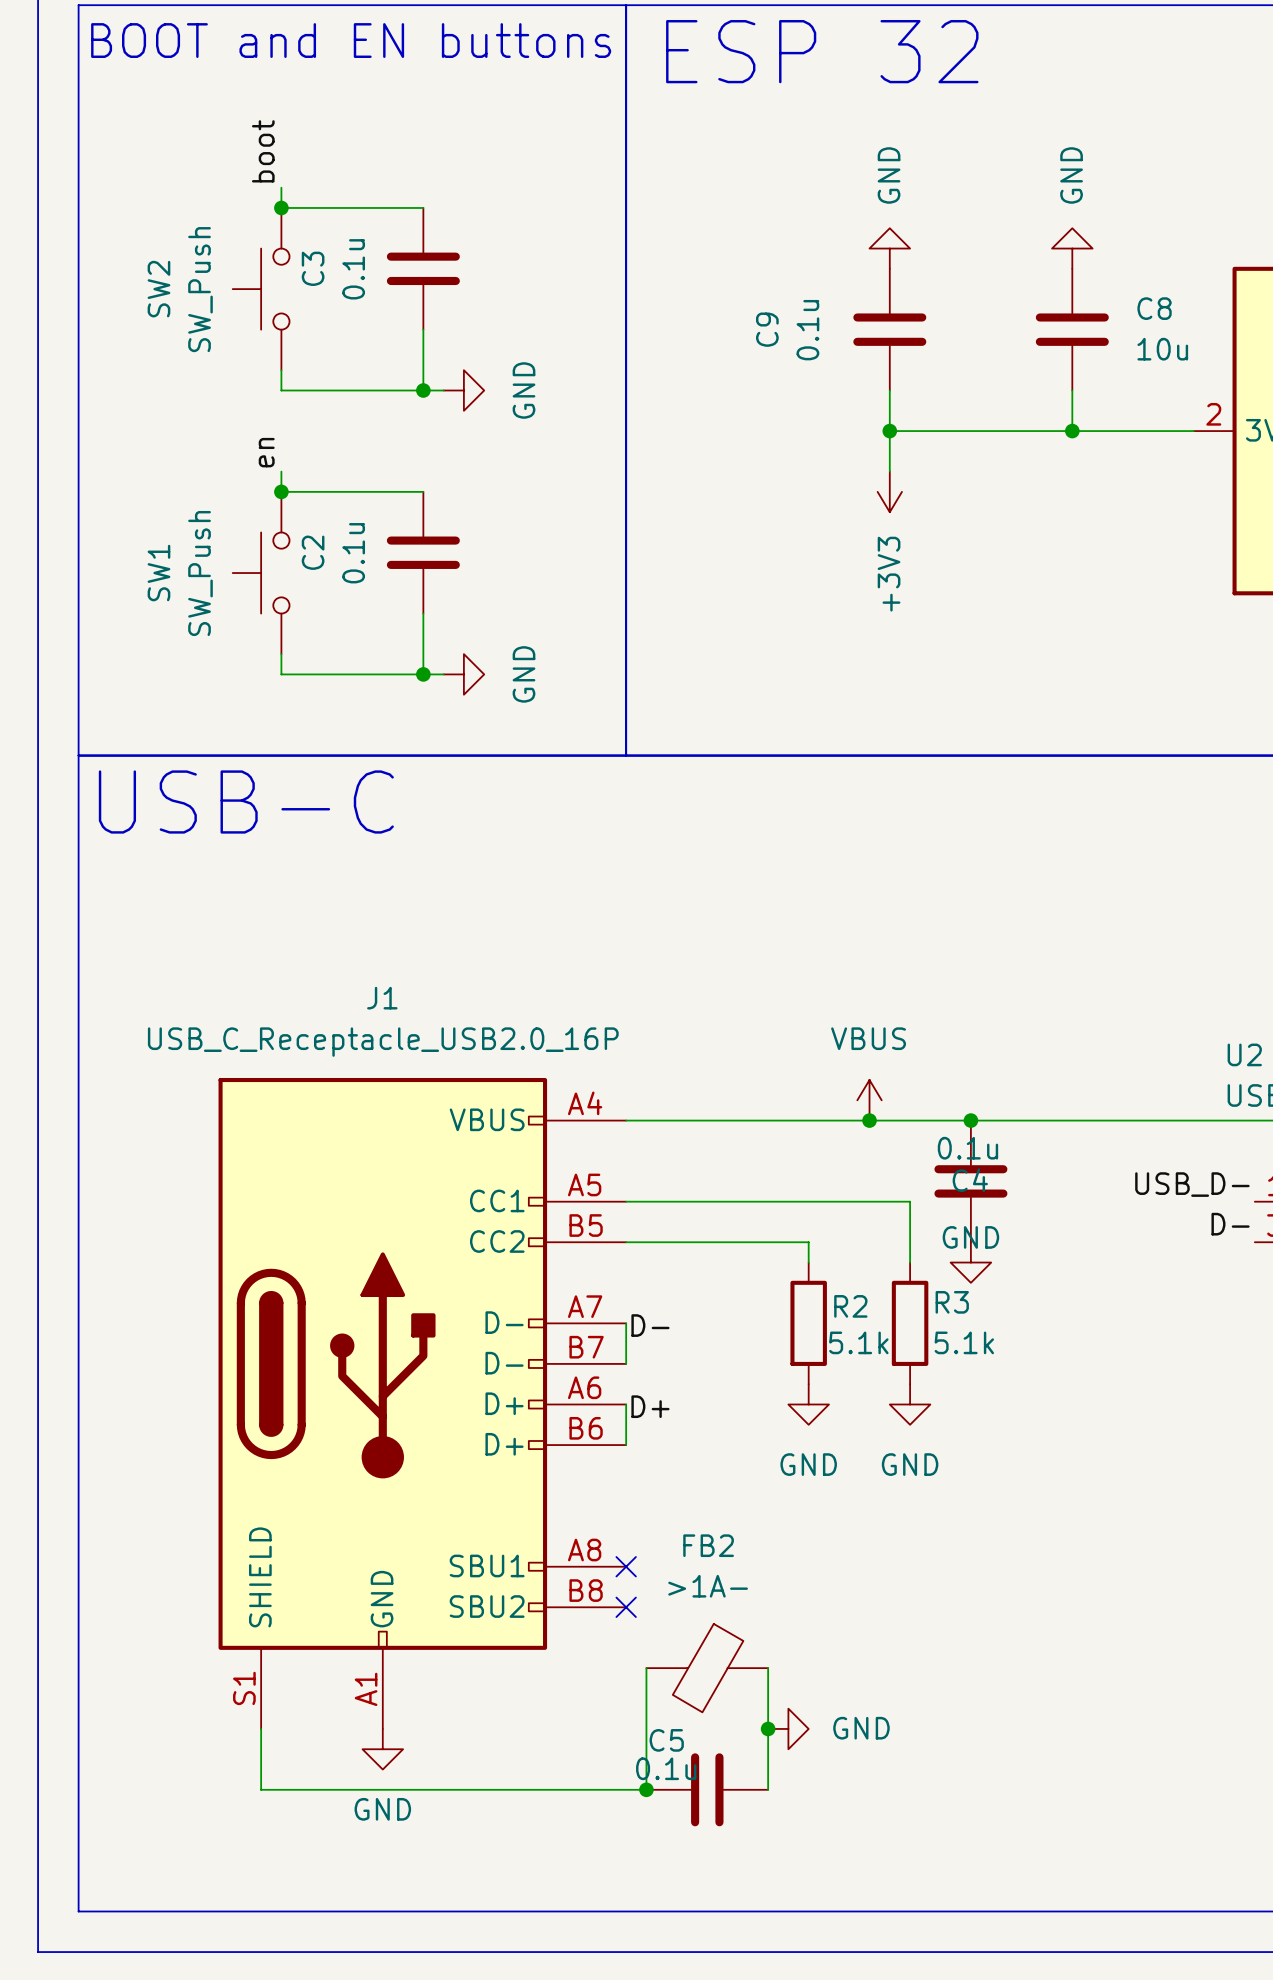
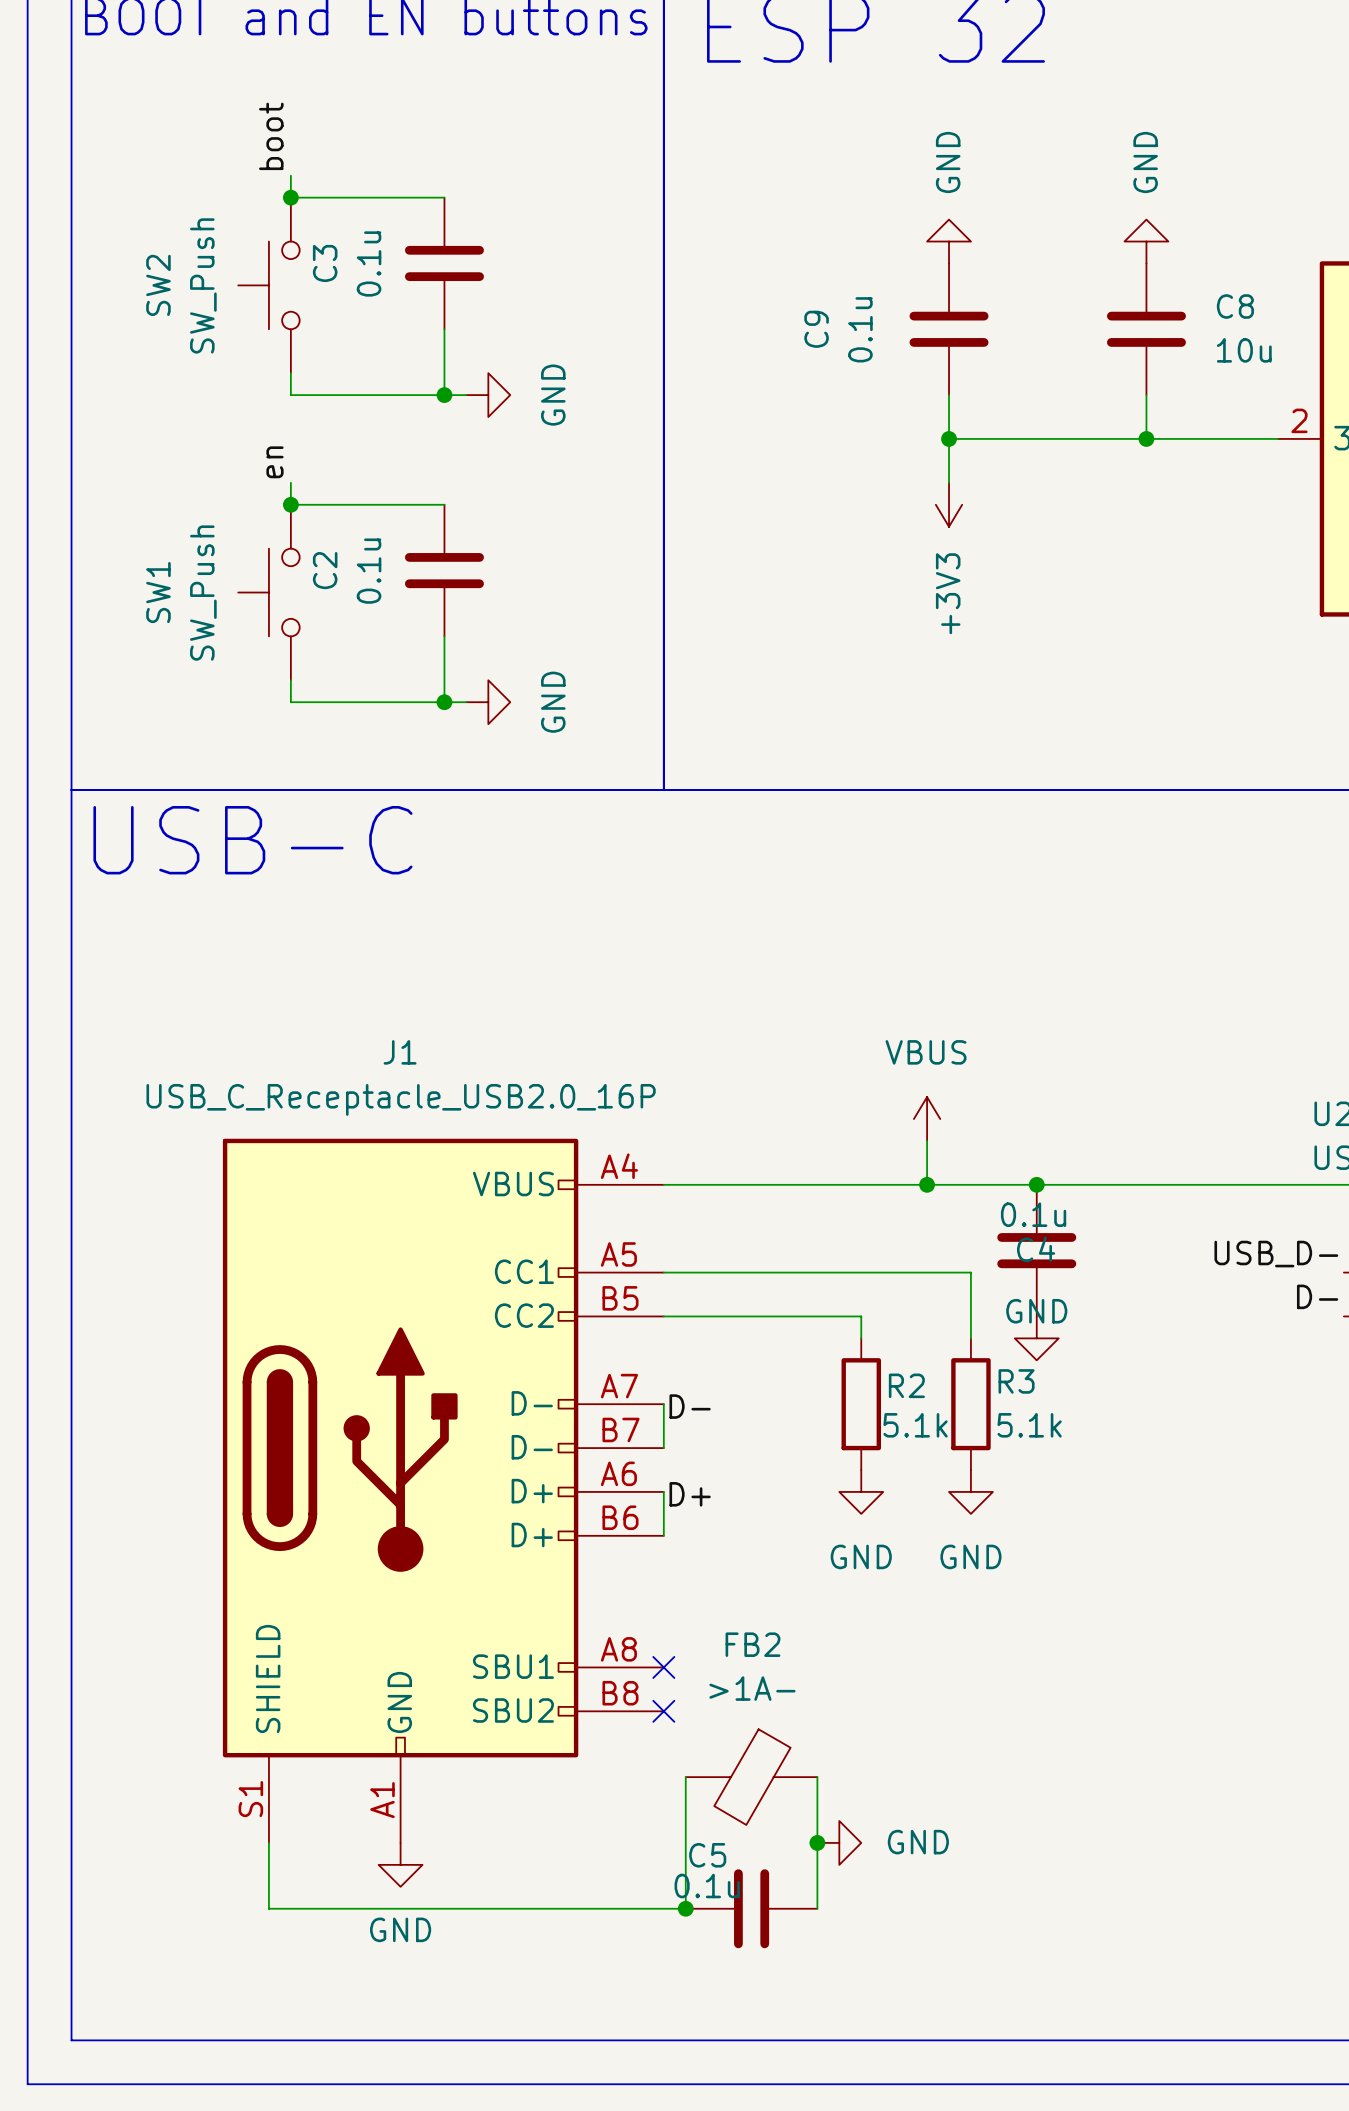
power symbol position: VBUS (869, 1100) -> VBUS (927, 1119)

